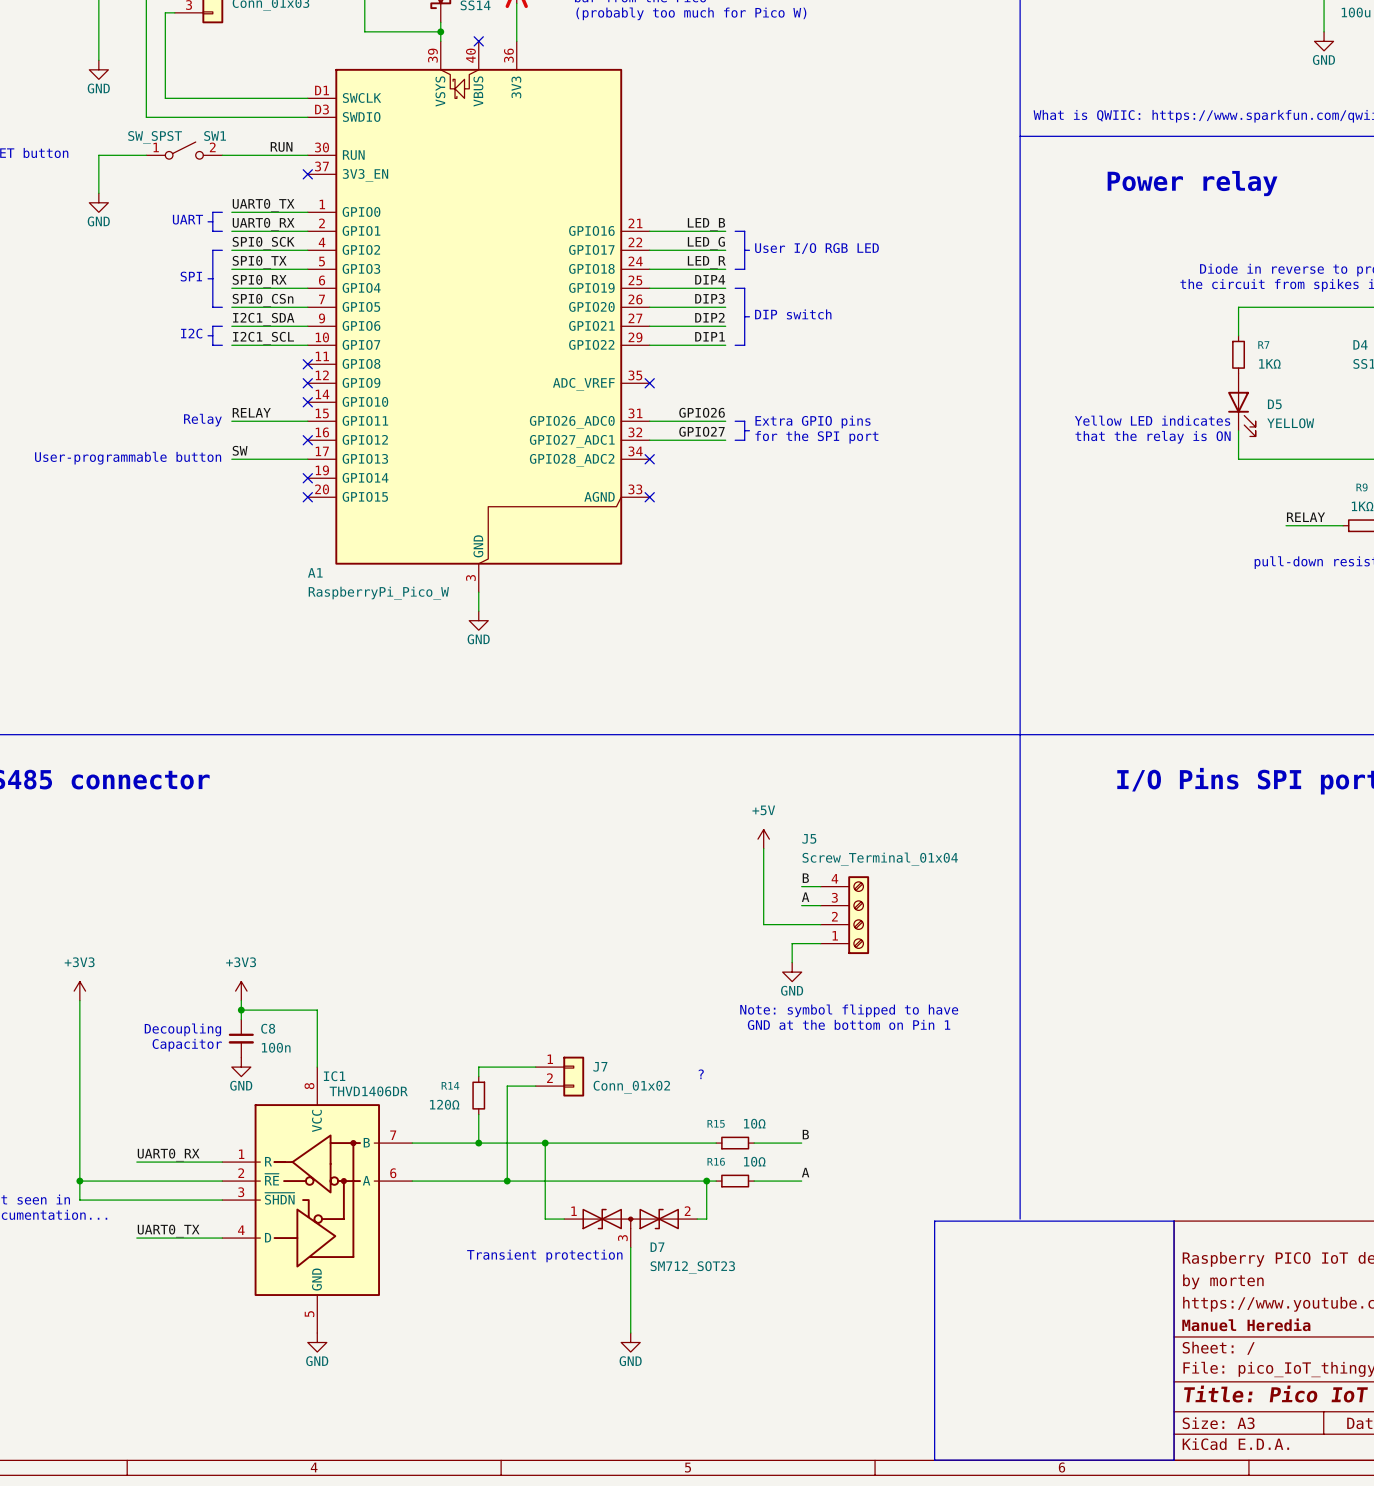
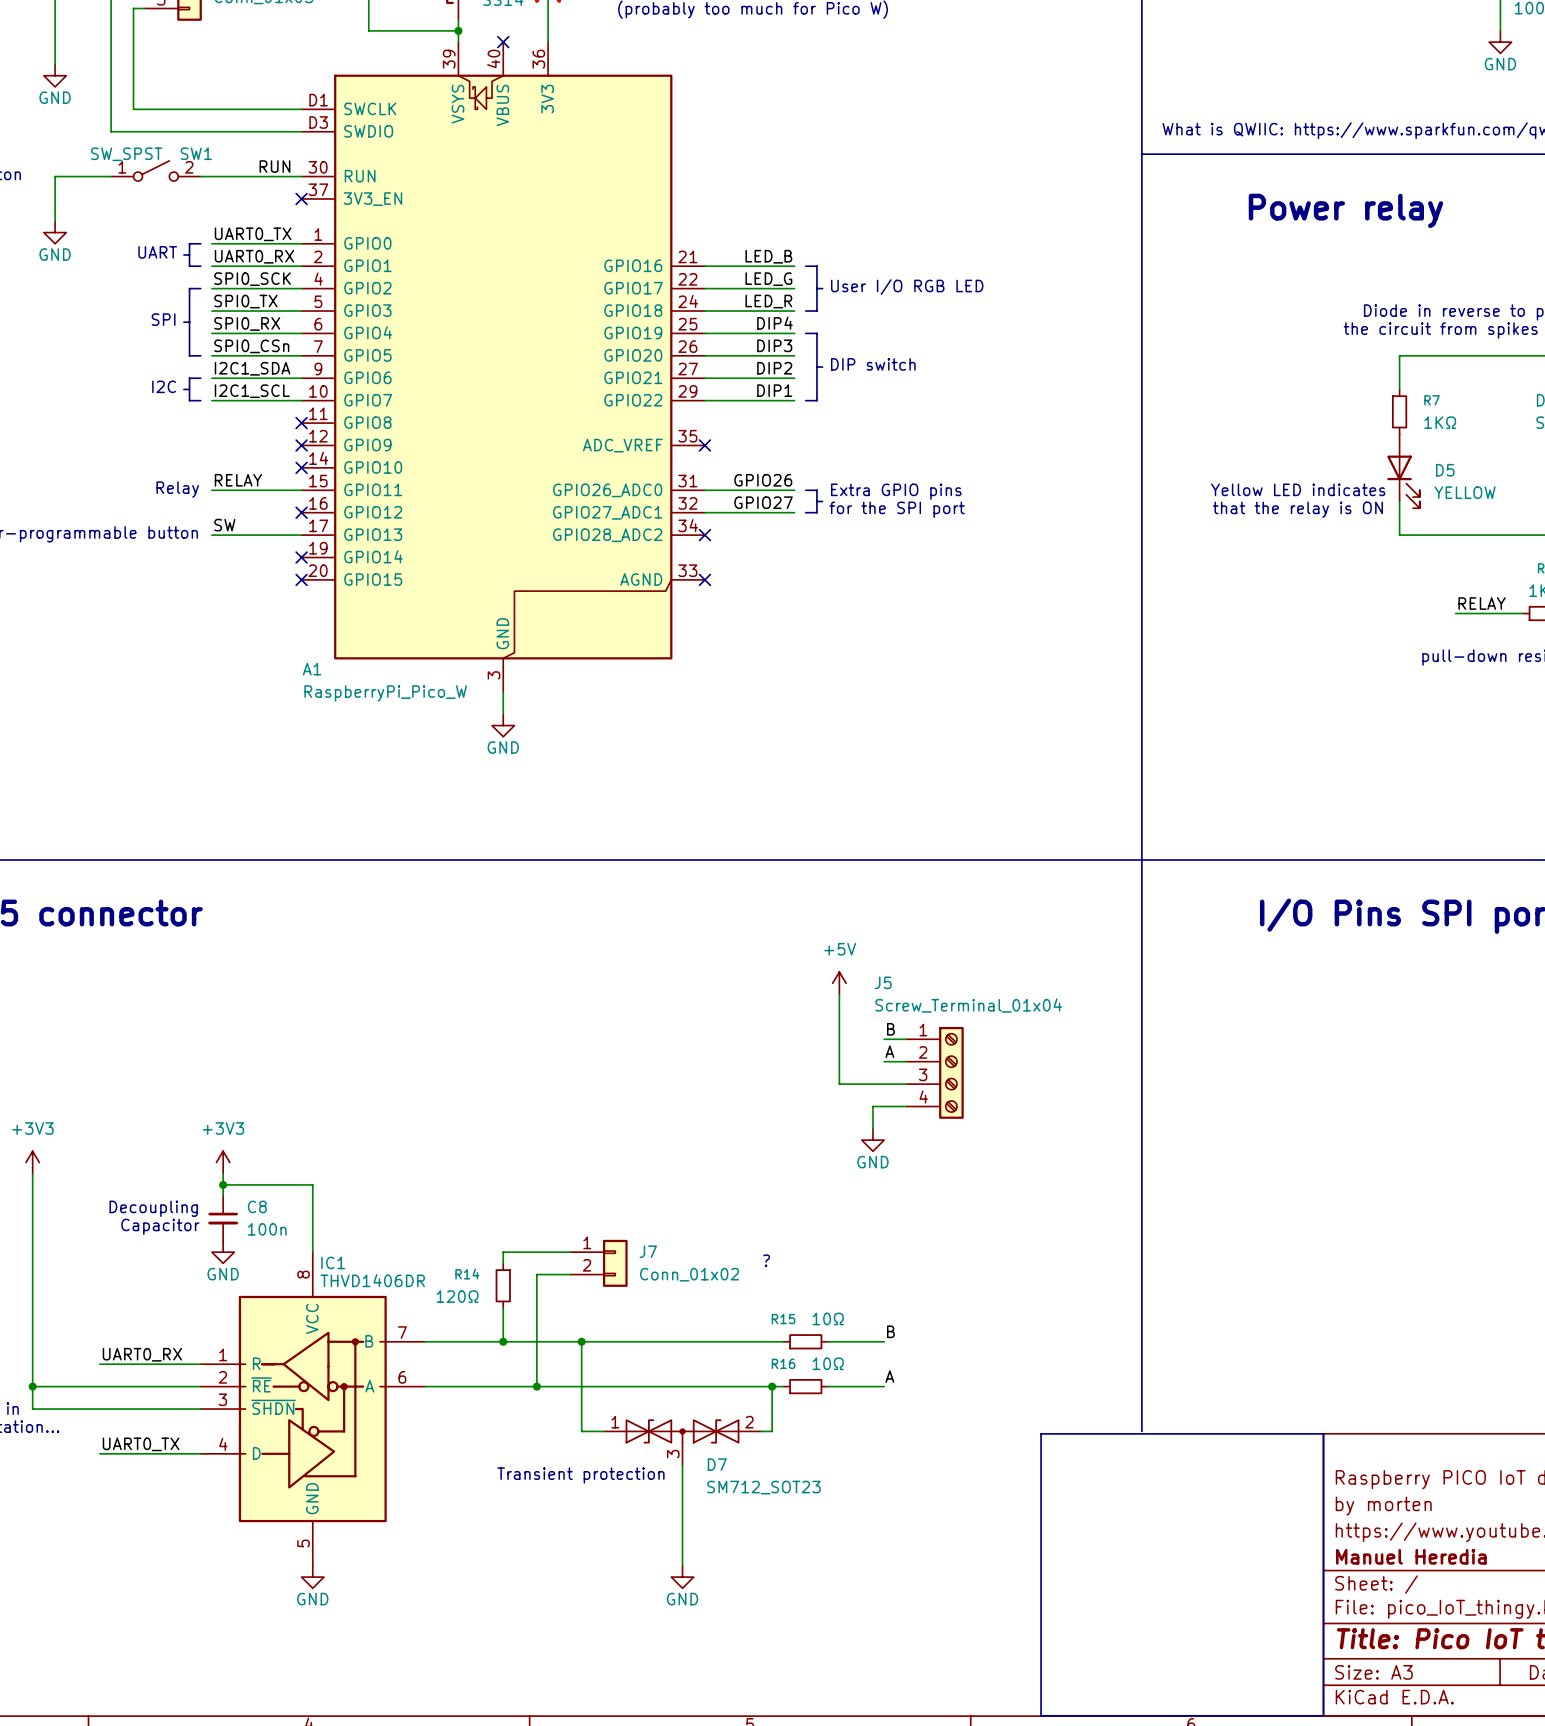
J5 flip: as is (858, 915) -> up-down (951, 1072)
text: Note: symbol flipped to have (849, 1010) -> none
text: GND at the bottom on Pin 1 (849, 1024) -> none

